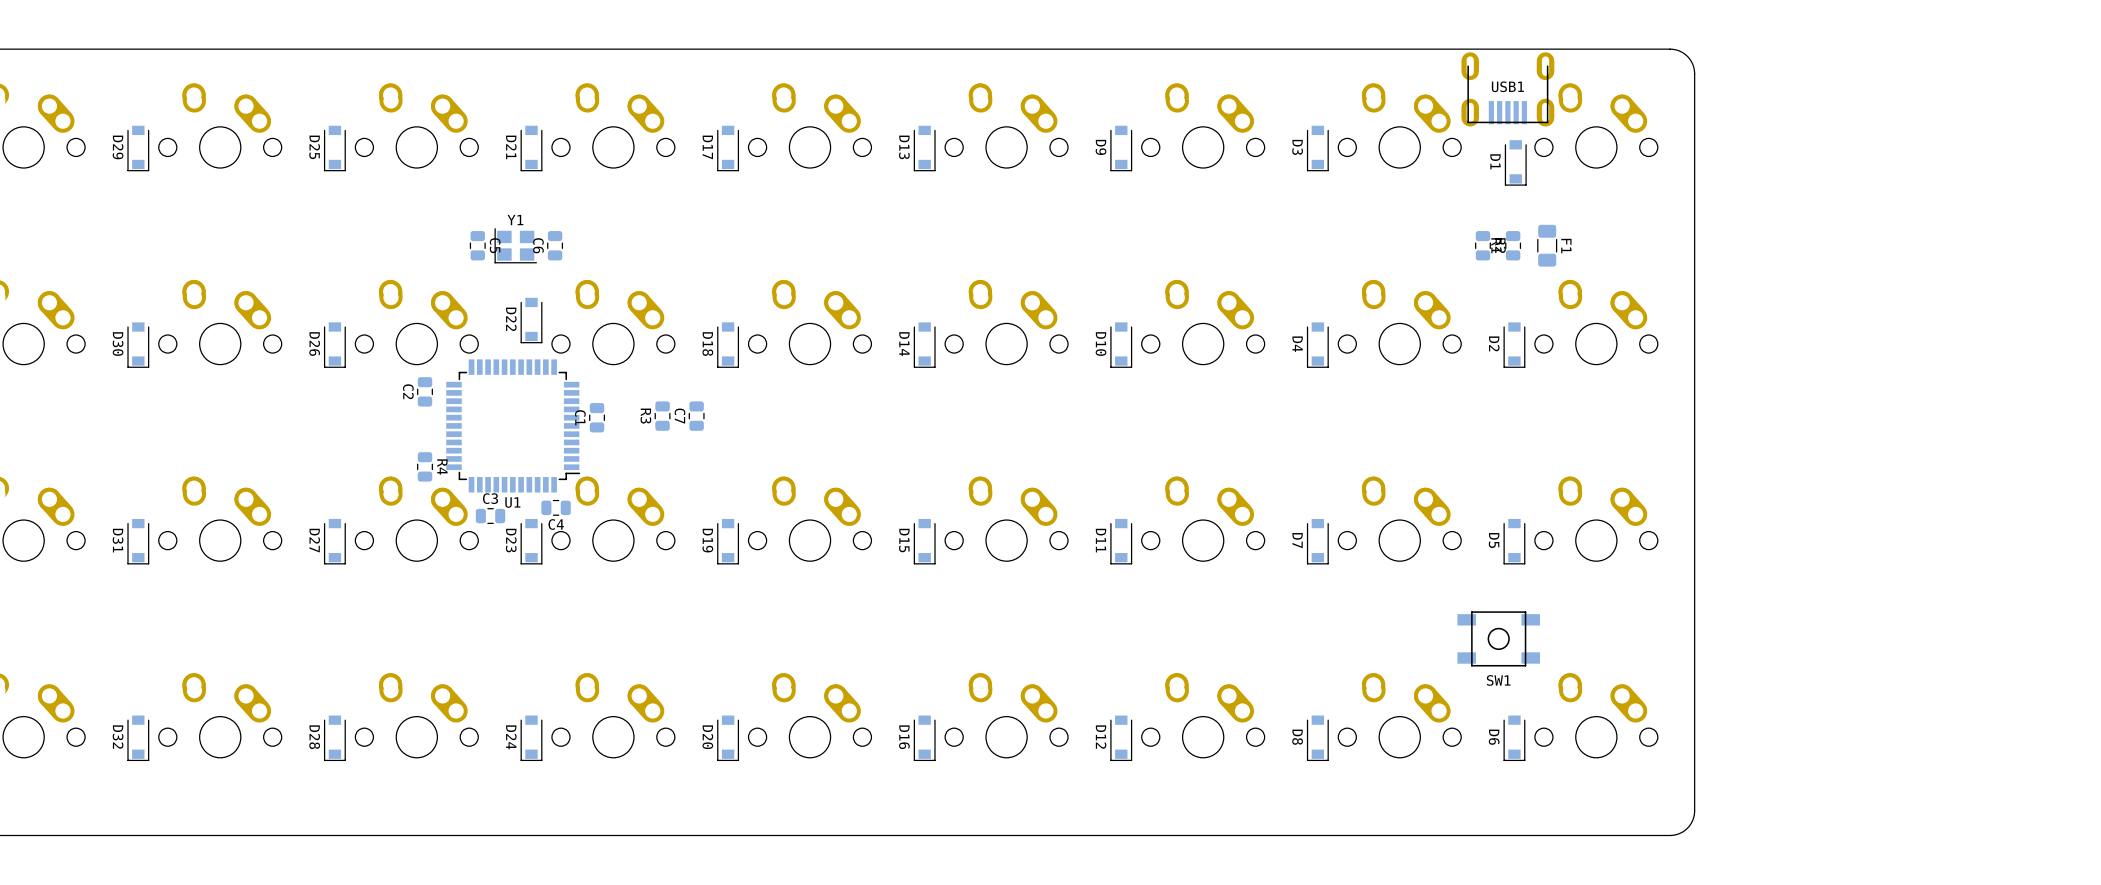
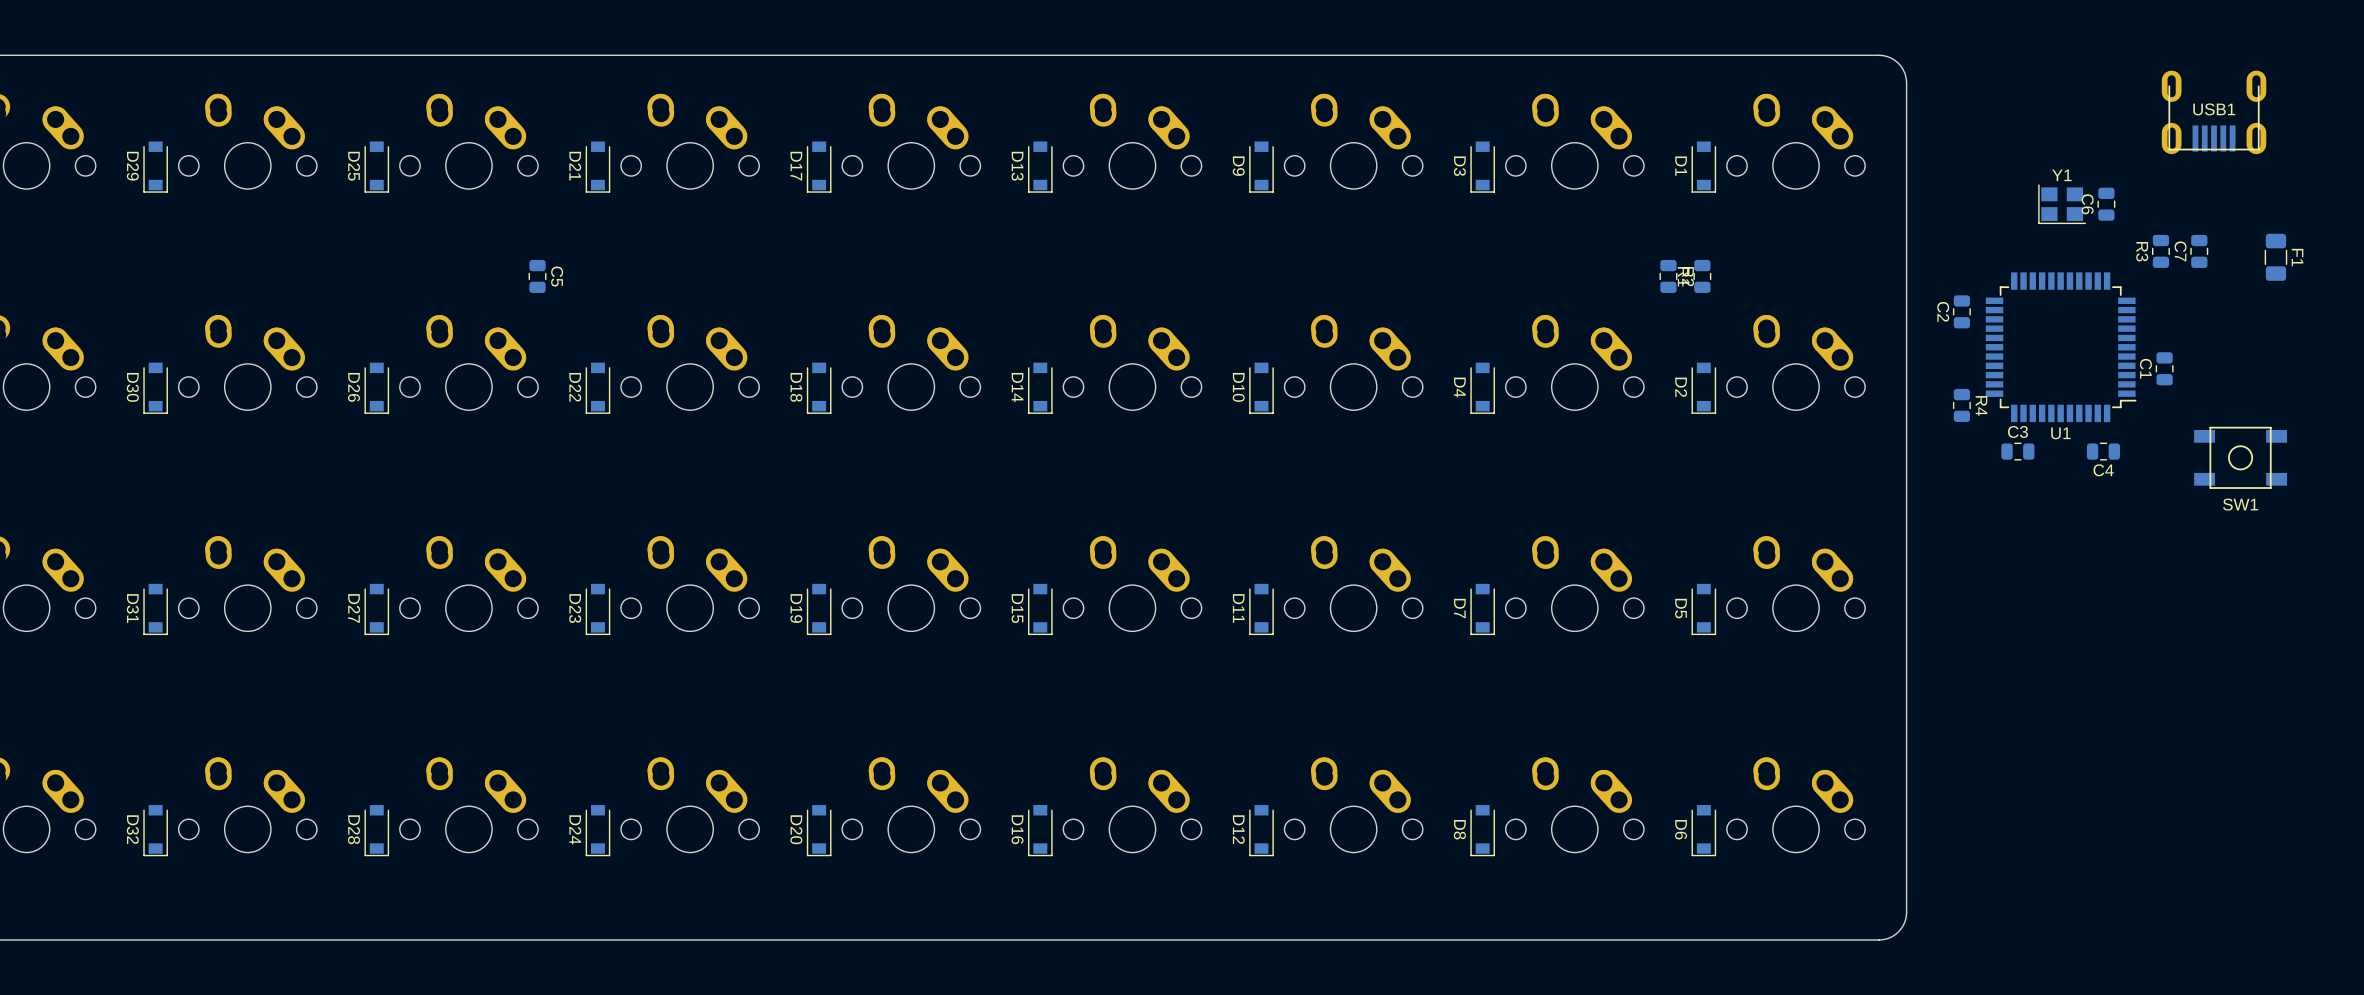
USB1 position: (1507, 89) -> (2214, 112)
D1 position: (1515, 162) -> (1703, 167)
Y1 position: (515, 245) -> (2062, 204)
C6 position: (555, 245) -> (2106, 204)
F1 position: (1547, 245) -> (2275, 257)
D22 position: (531, 320) -> (597, 388)
C2 position: (425, 391) -> (1961, 311)
R3 position: (662, 416) -> (2160, 251)
C7 position: (696, 416) -> (2199, 251)
C1 position: (597, 417) -> (2164, 368)
U1 position: (513, 425) -> (2061, 347)
R4 position: (425, 466) -> (1961, 405)
C4 position: (556, 507) -> (2103, 451)
C3 position: (490, 516) -> (2017, 451)
SW1 position: (1498, 638) -> (2240, 457)

